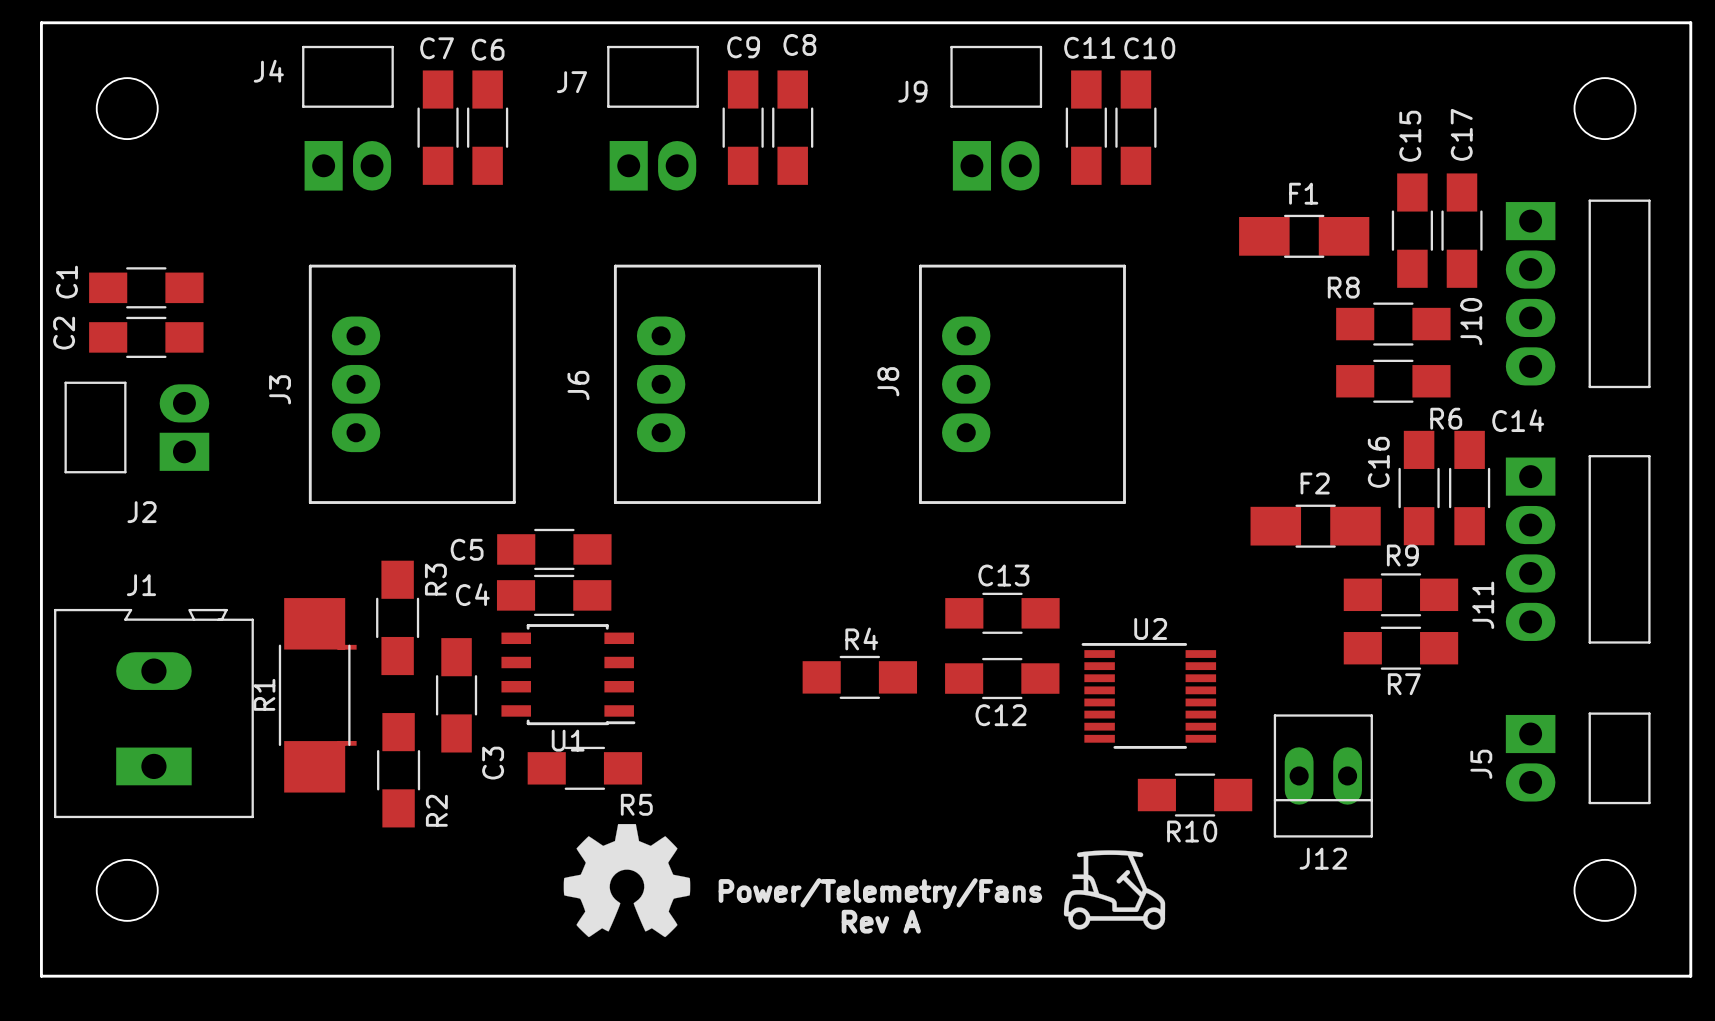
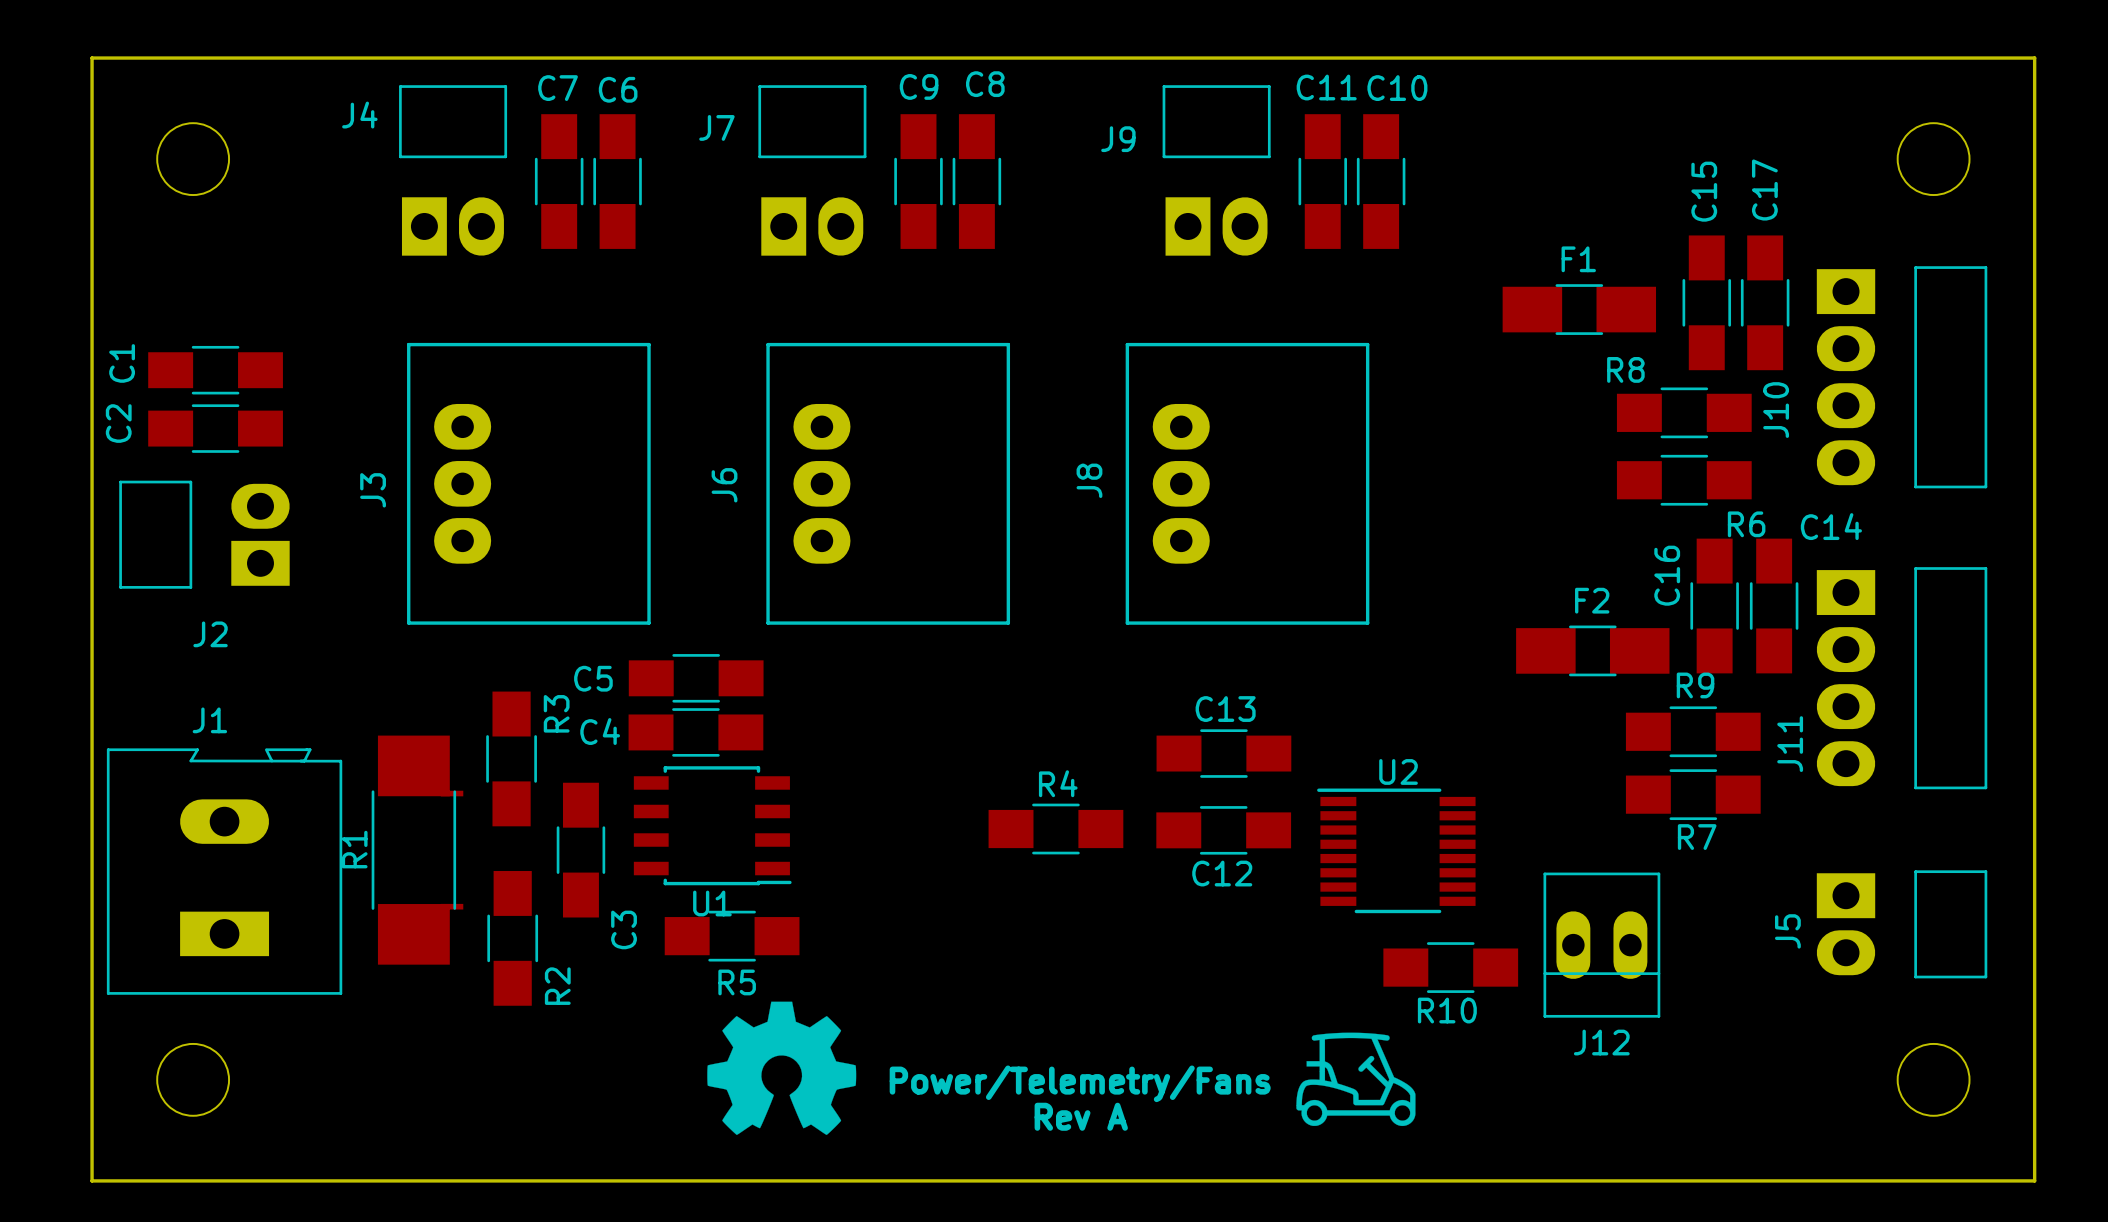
R5 name position: R5 (636, 804) -> R5 (737, 982)

